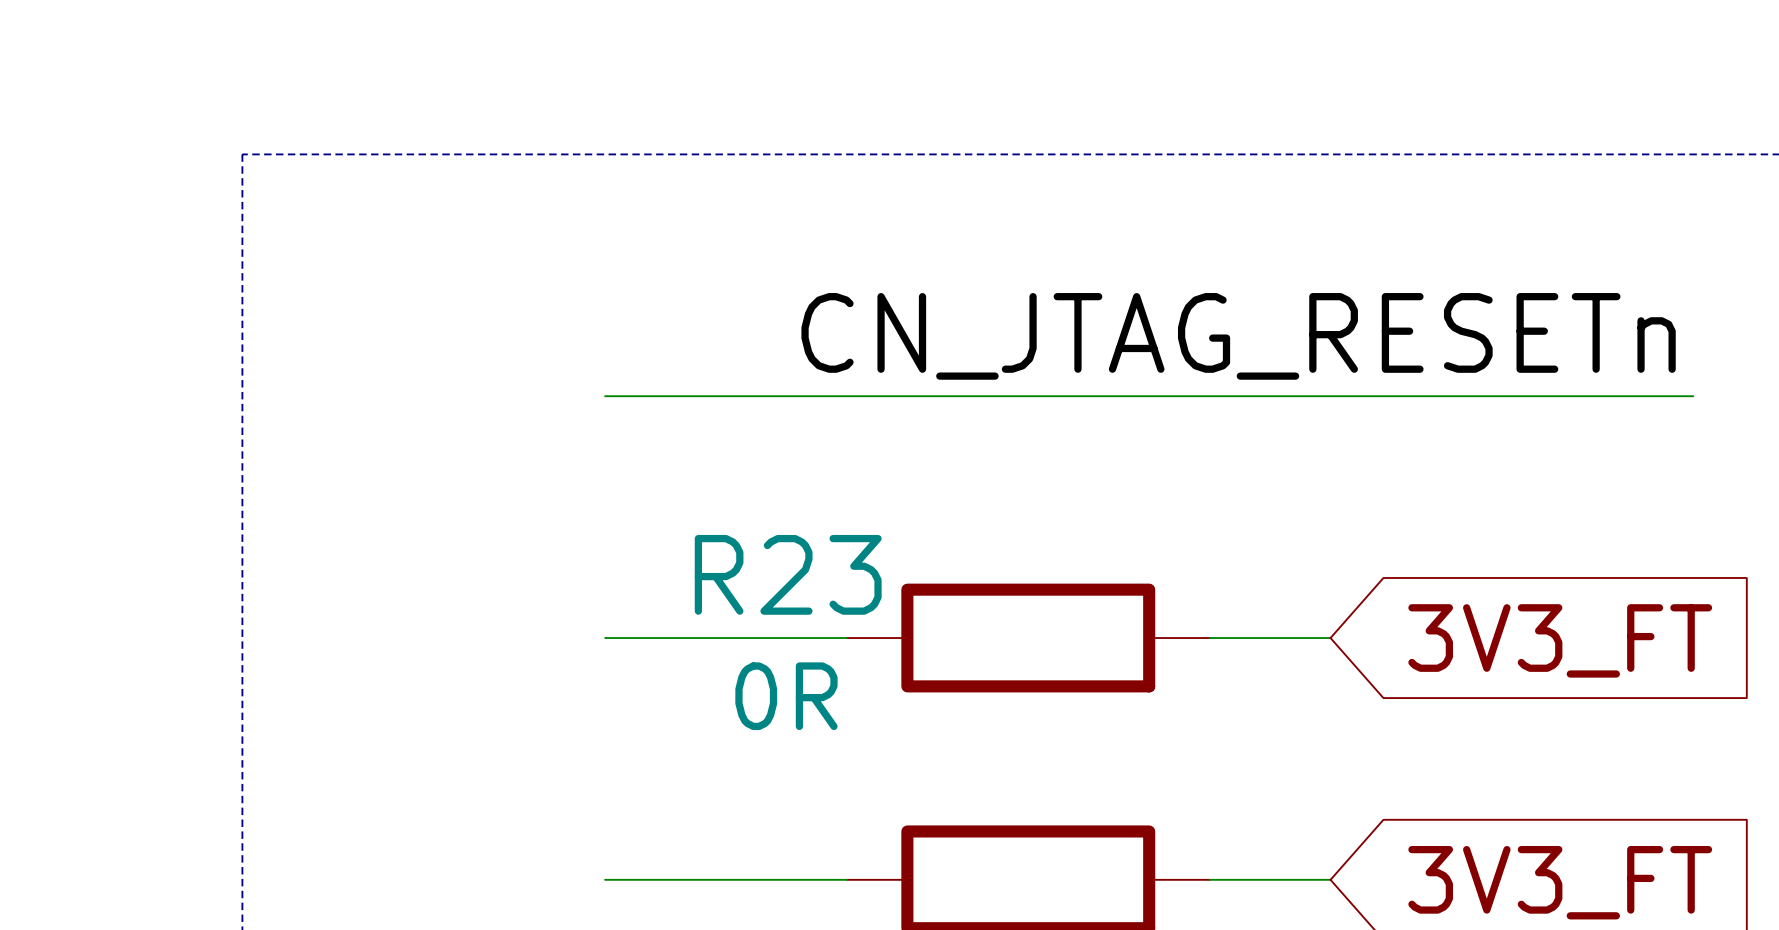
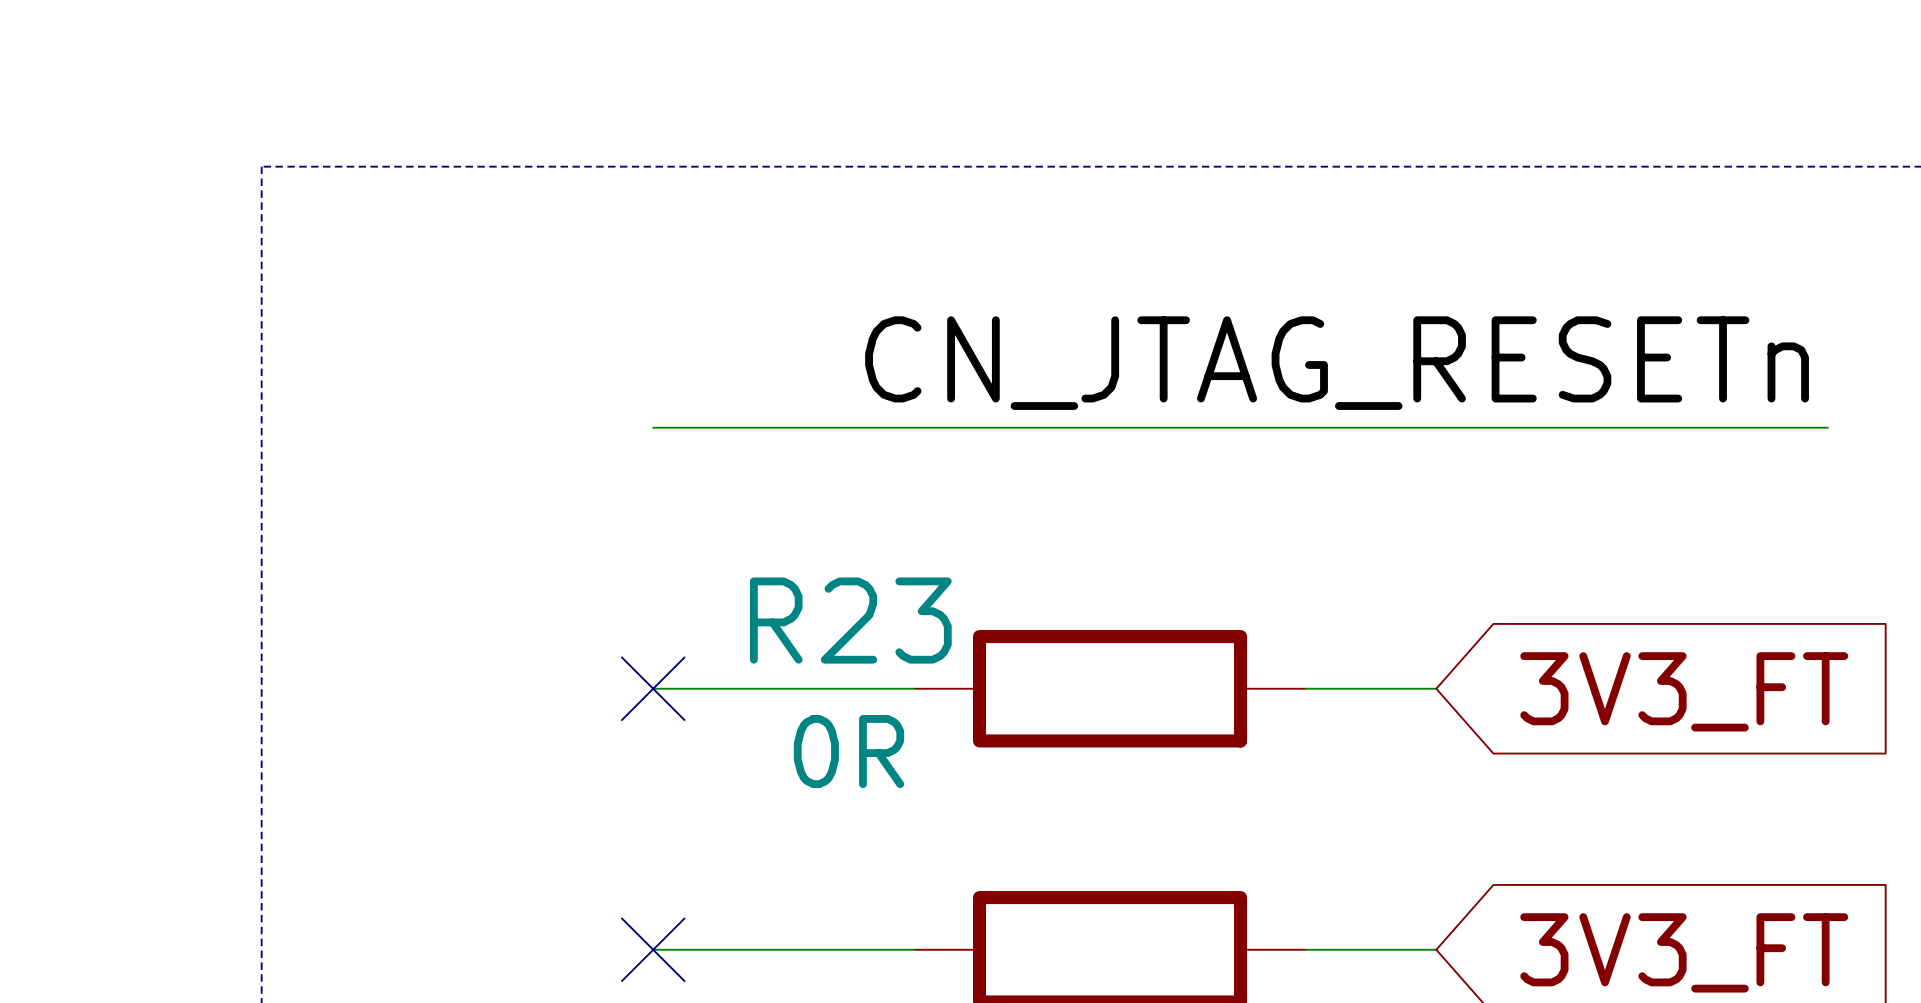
no-connect mark: none -> (653, 688)
no-connect mark: none -> (653, 949)

